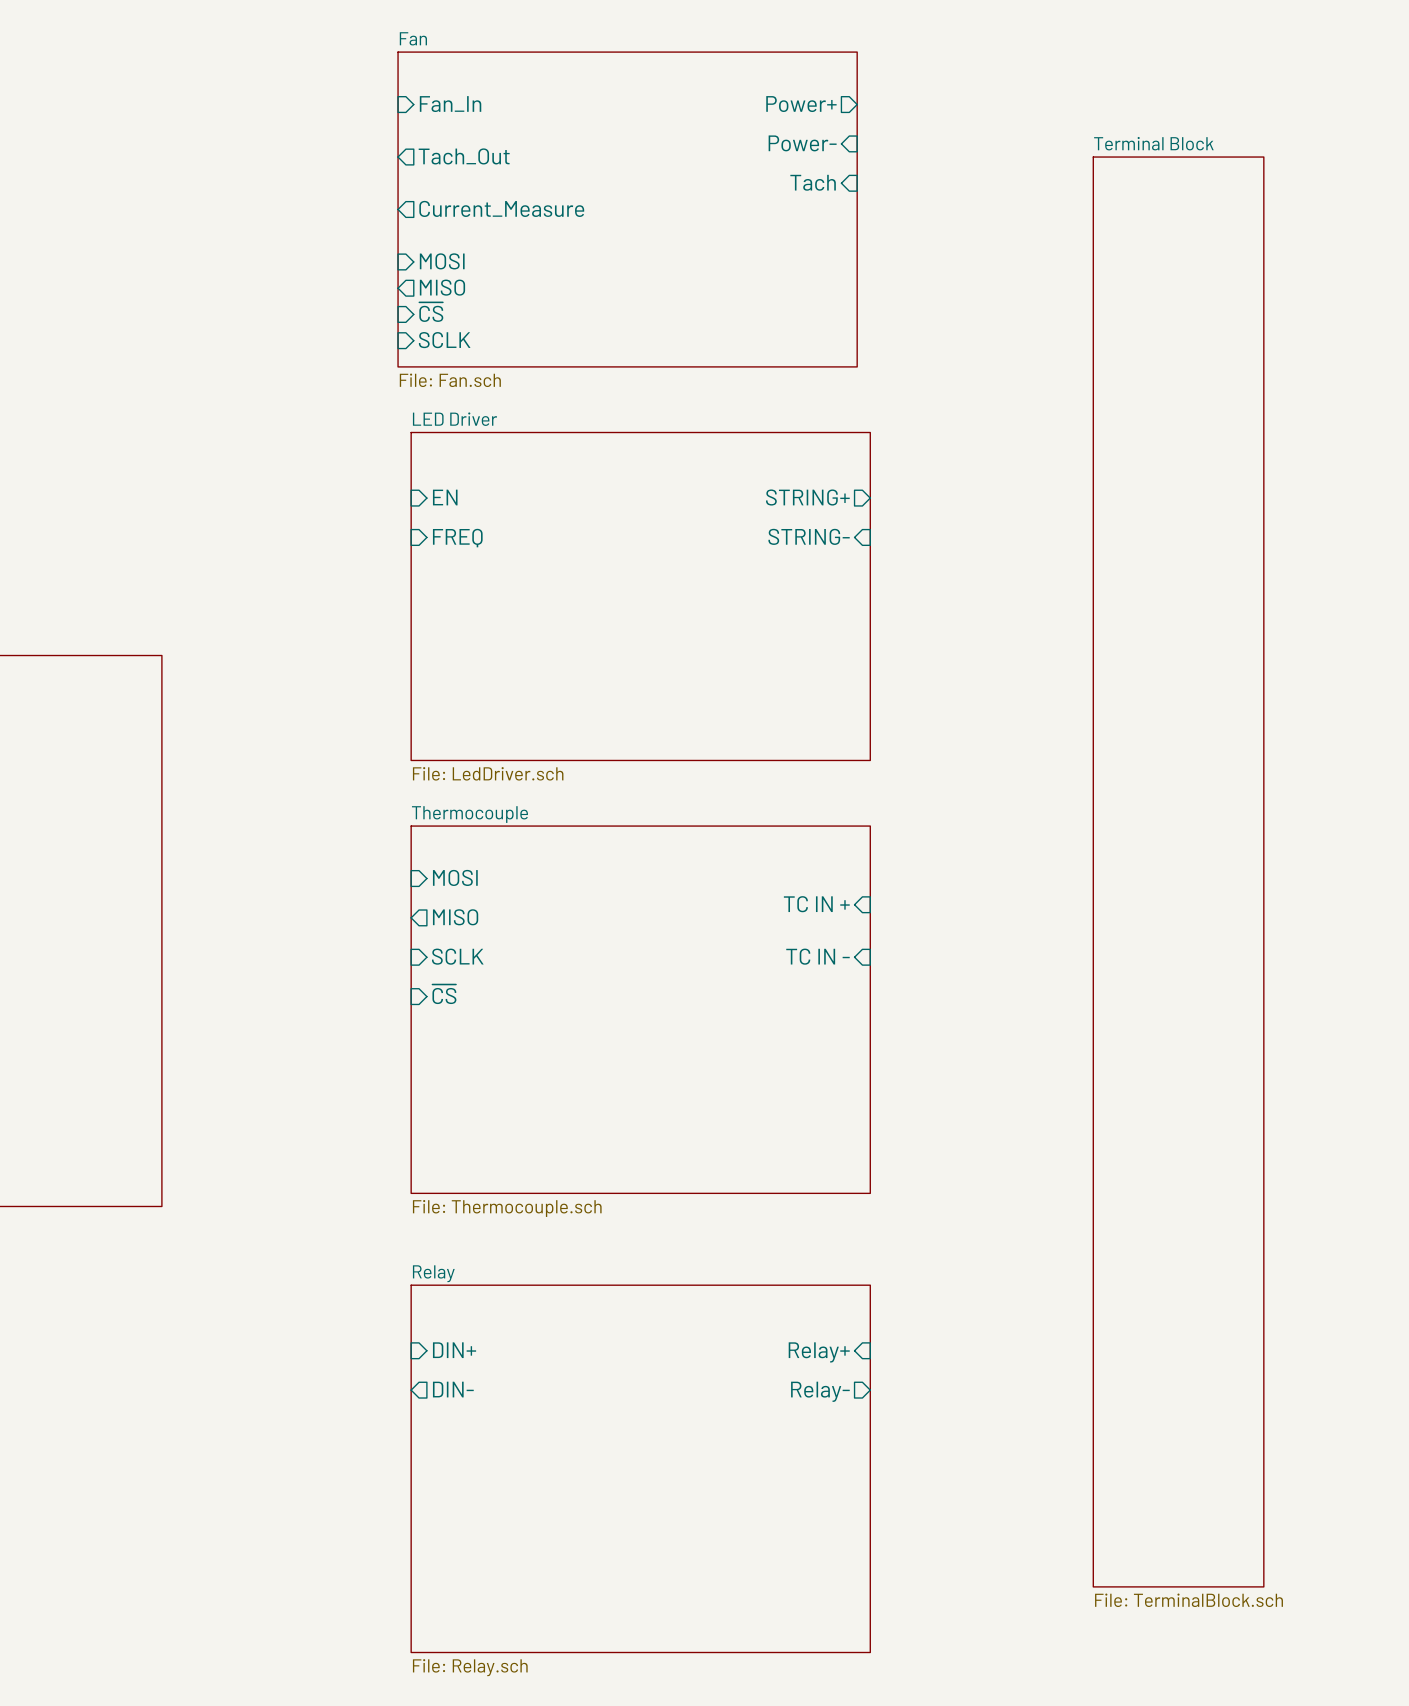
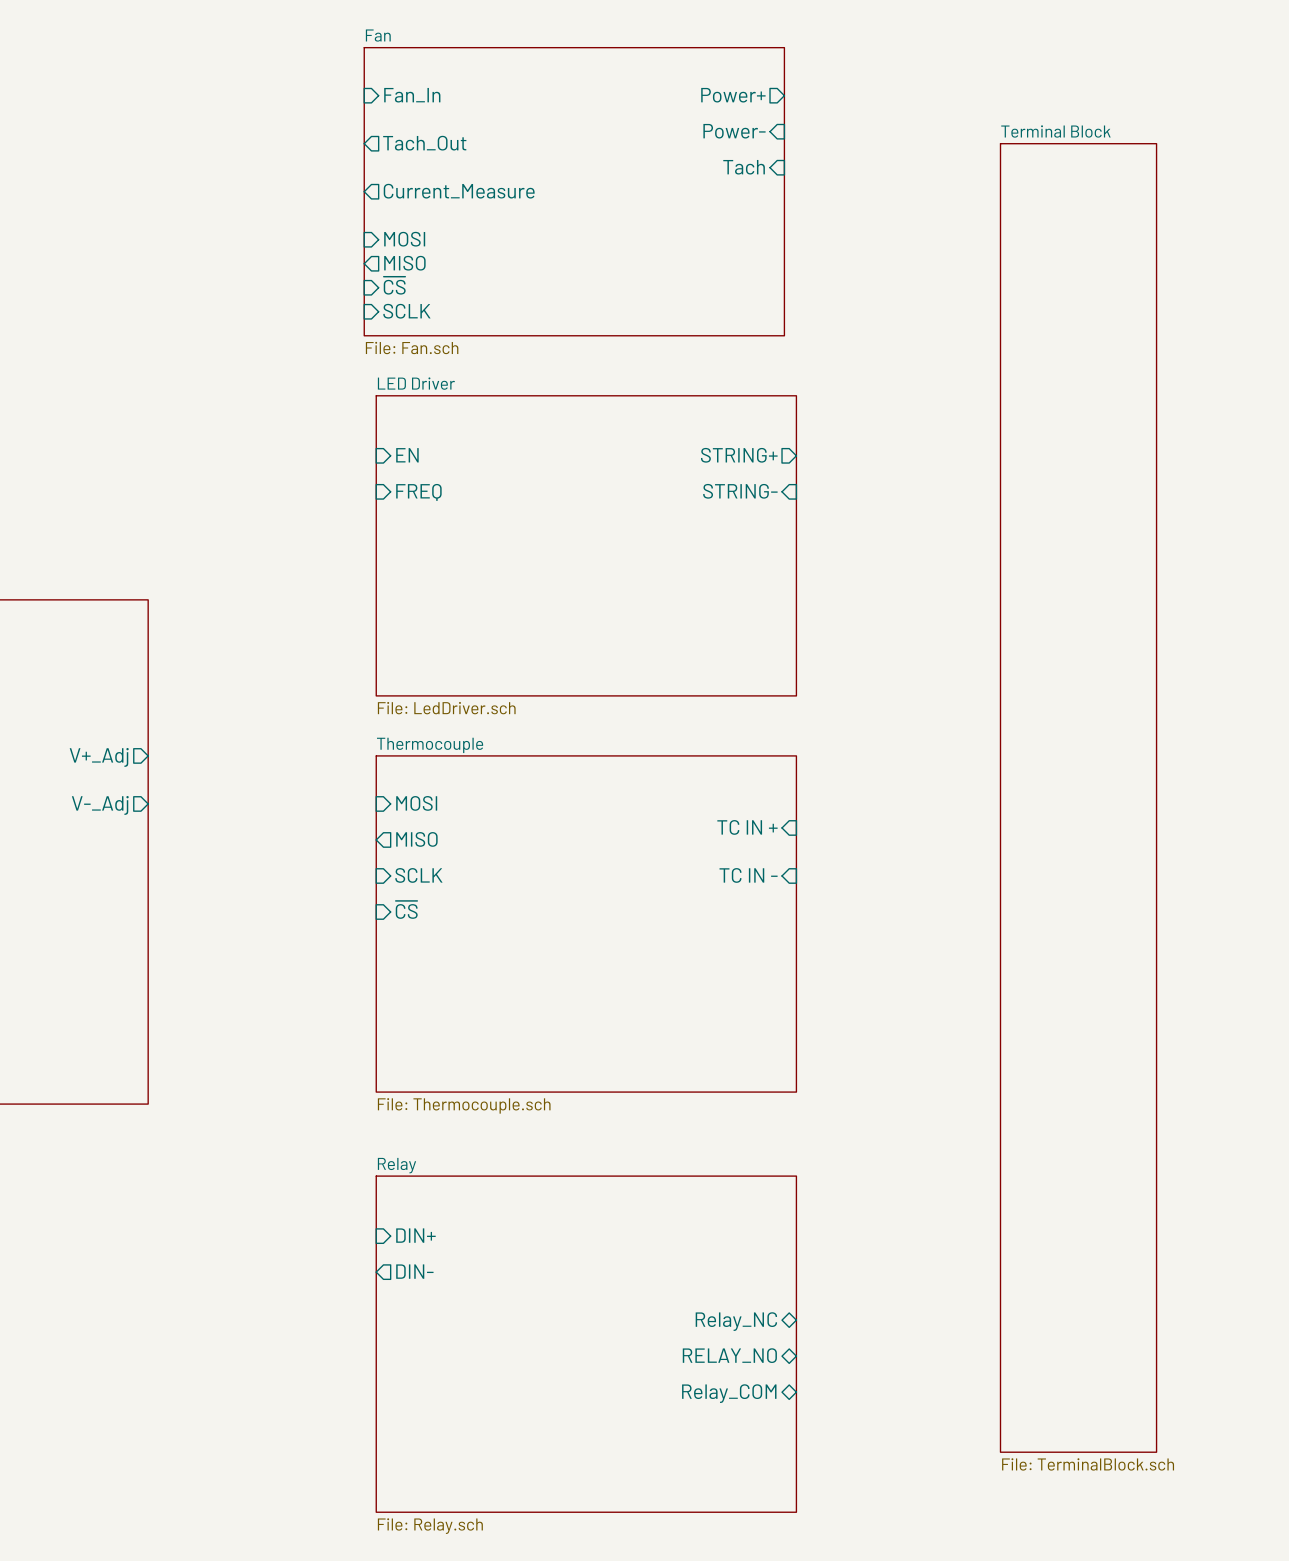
sheet pin: none -> V+_Adj (99, 757)
sheet pin: none -> V-_Adj (100, 805)
sheet pin: Relay+ (819, 1352) -> none
sheet pin: Relay- (820, 1391) -> none
sheet pin: none -> Relay_NC (736, 1321)
sheet pin: none -> RELAY_NO (729, 1355)
sheet pin: none -> Relay_COM (729, 1393)

